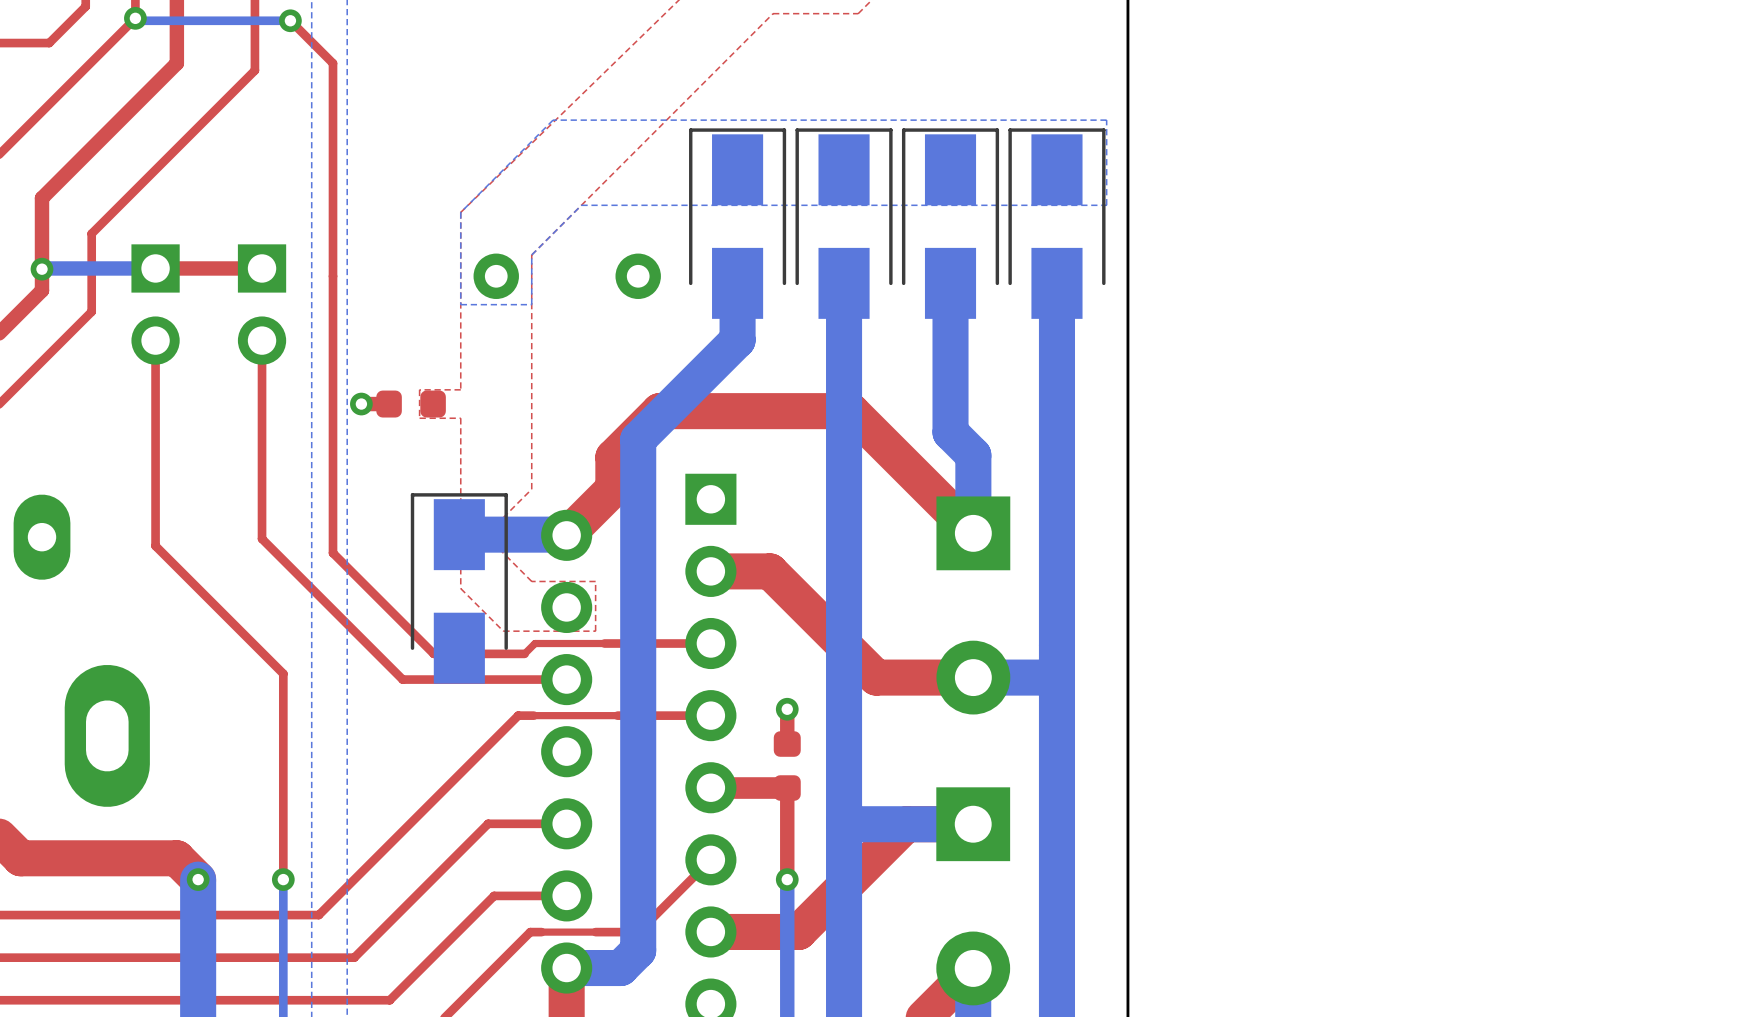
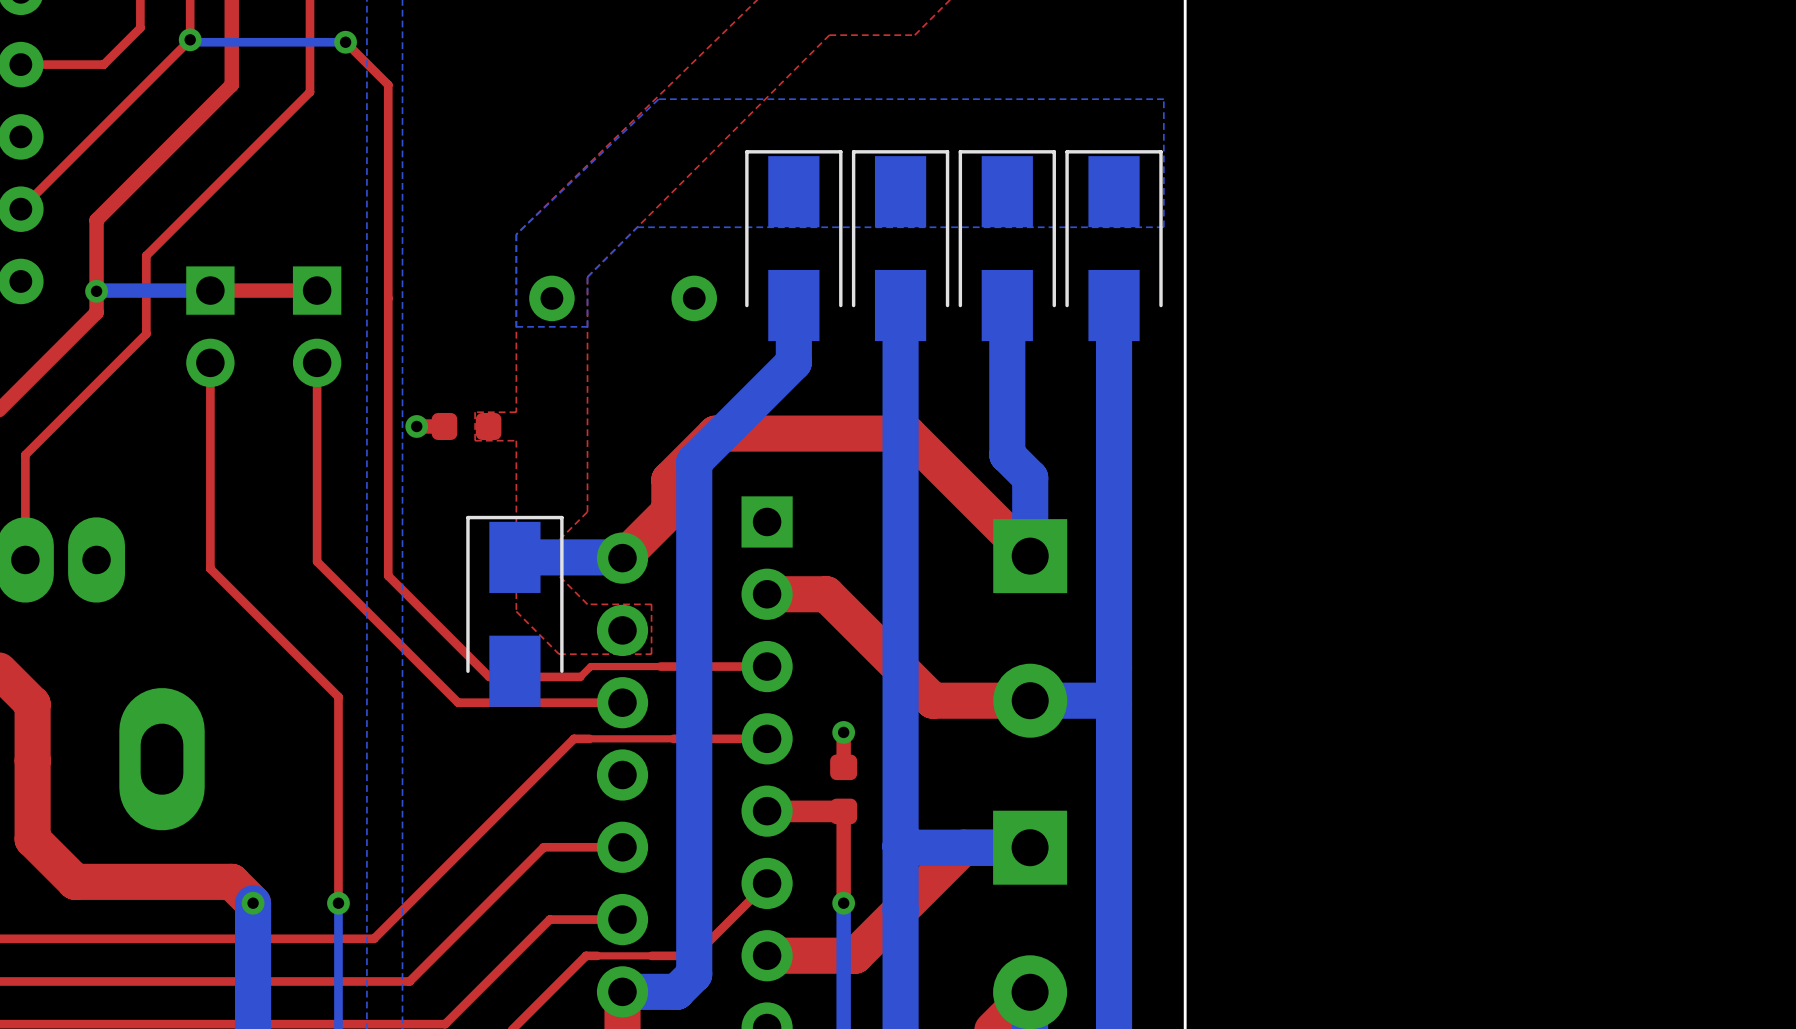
bottom zone outline: (1106, 120) (553, 120) (460, 212) -> (1163, 141) (1163, 99) (658, 99) (516, 234)

